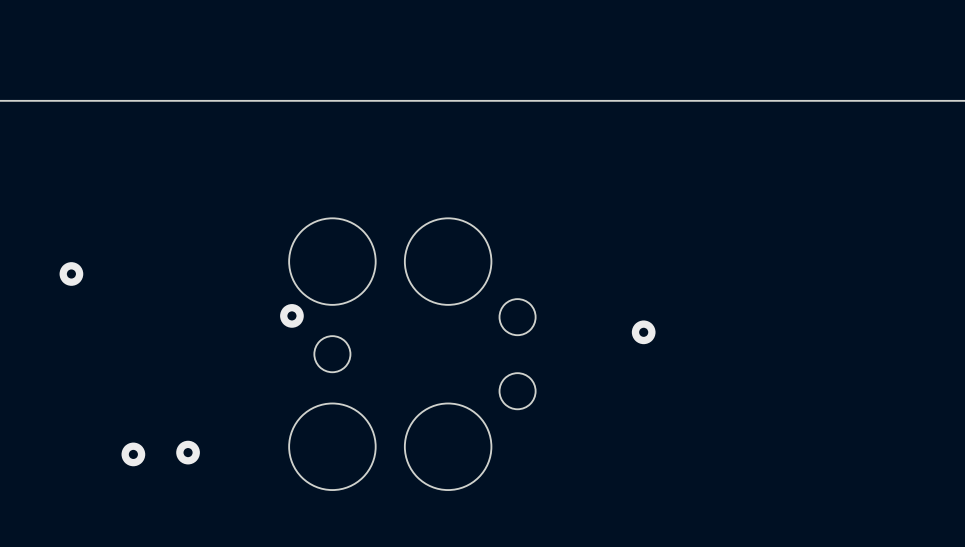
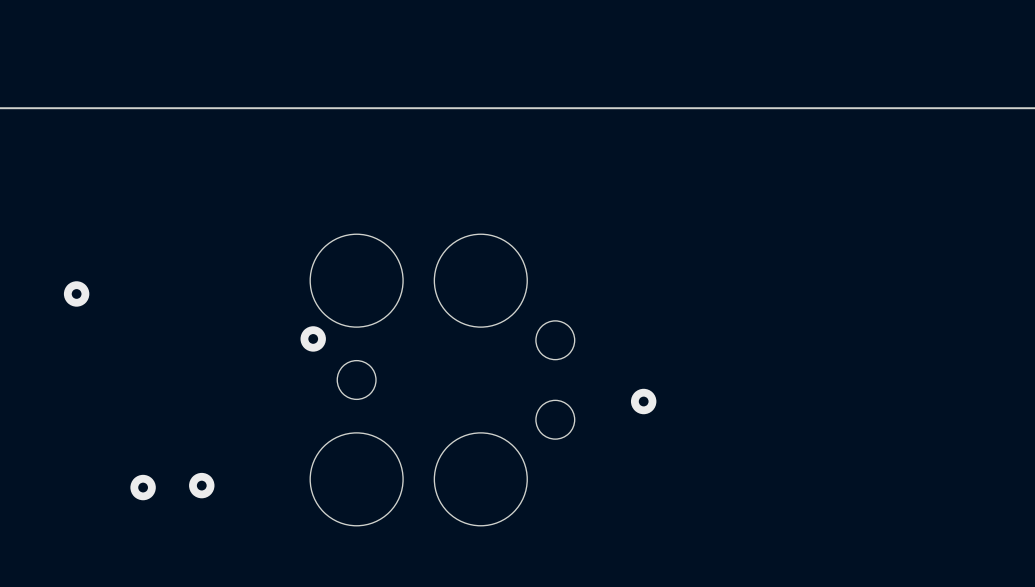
via position: (643, 332) -> (643, 401)

